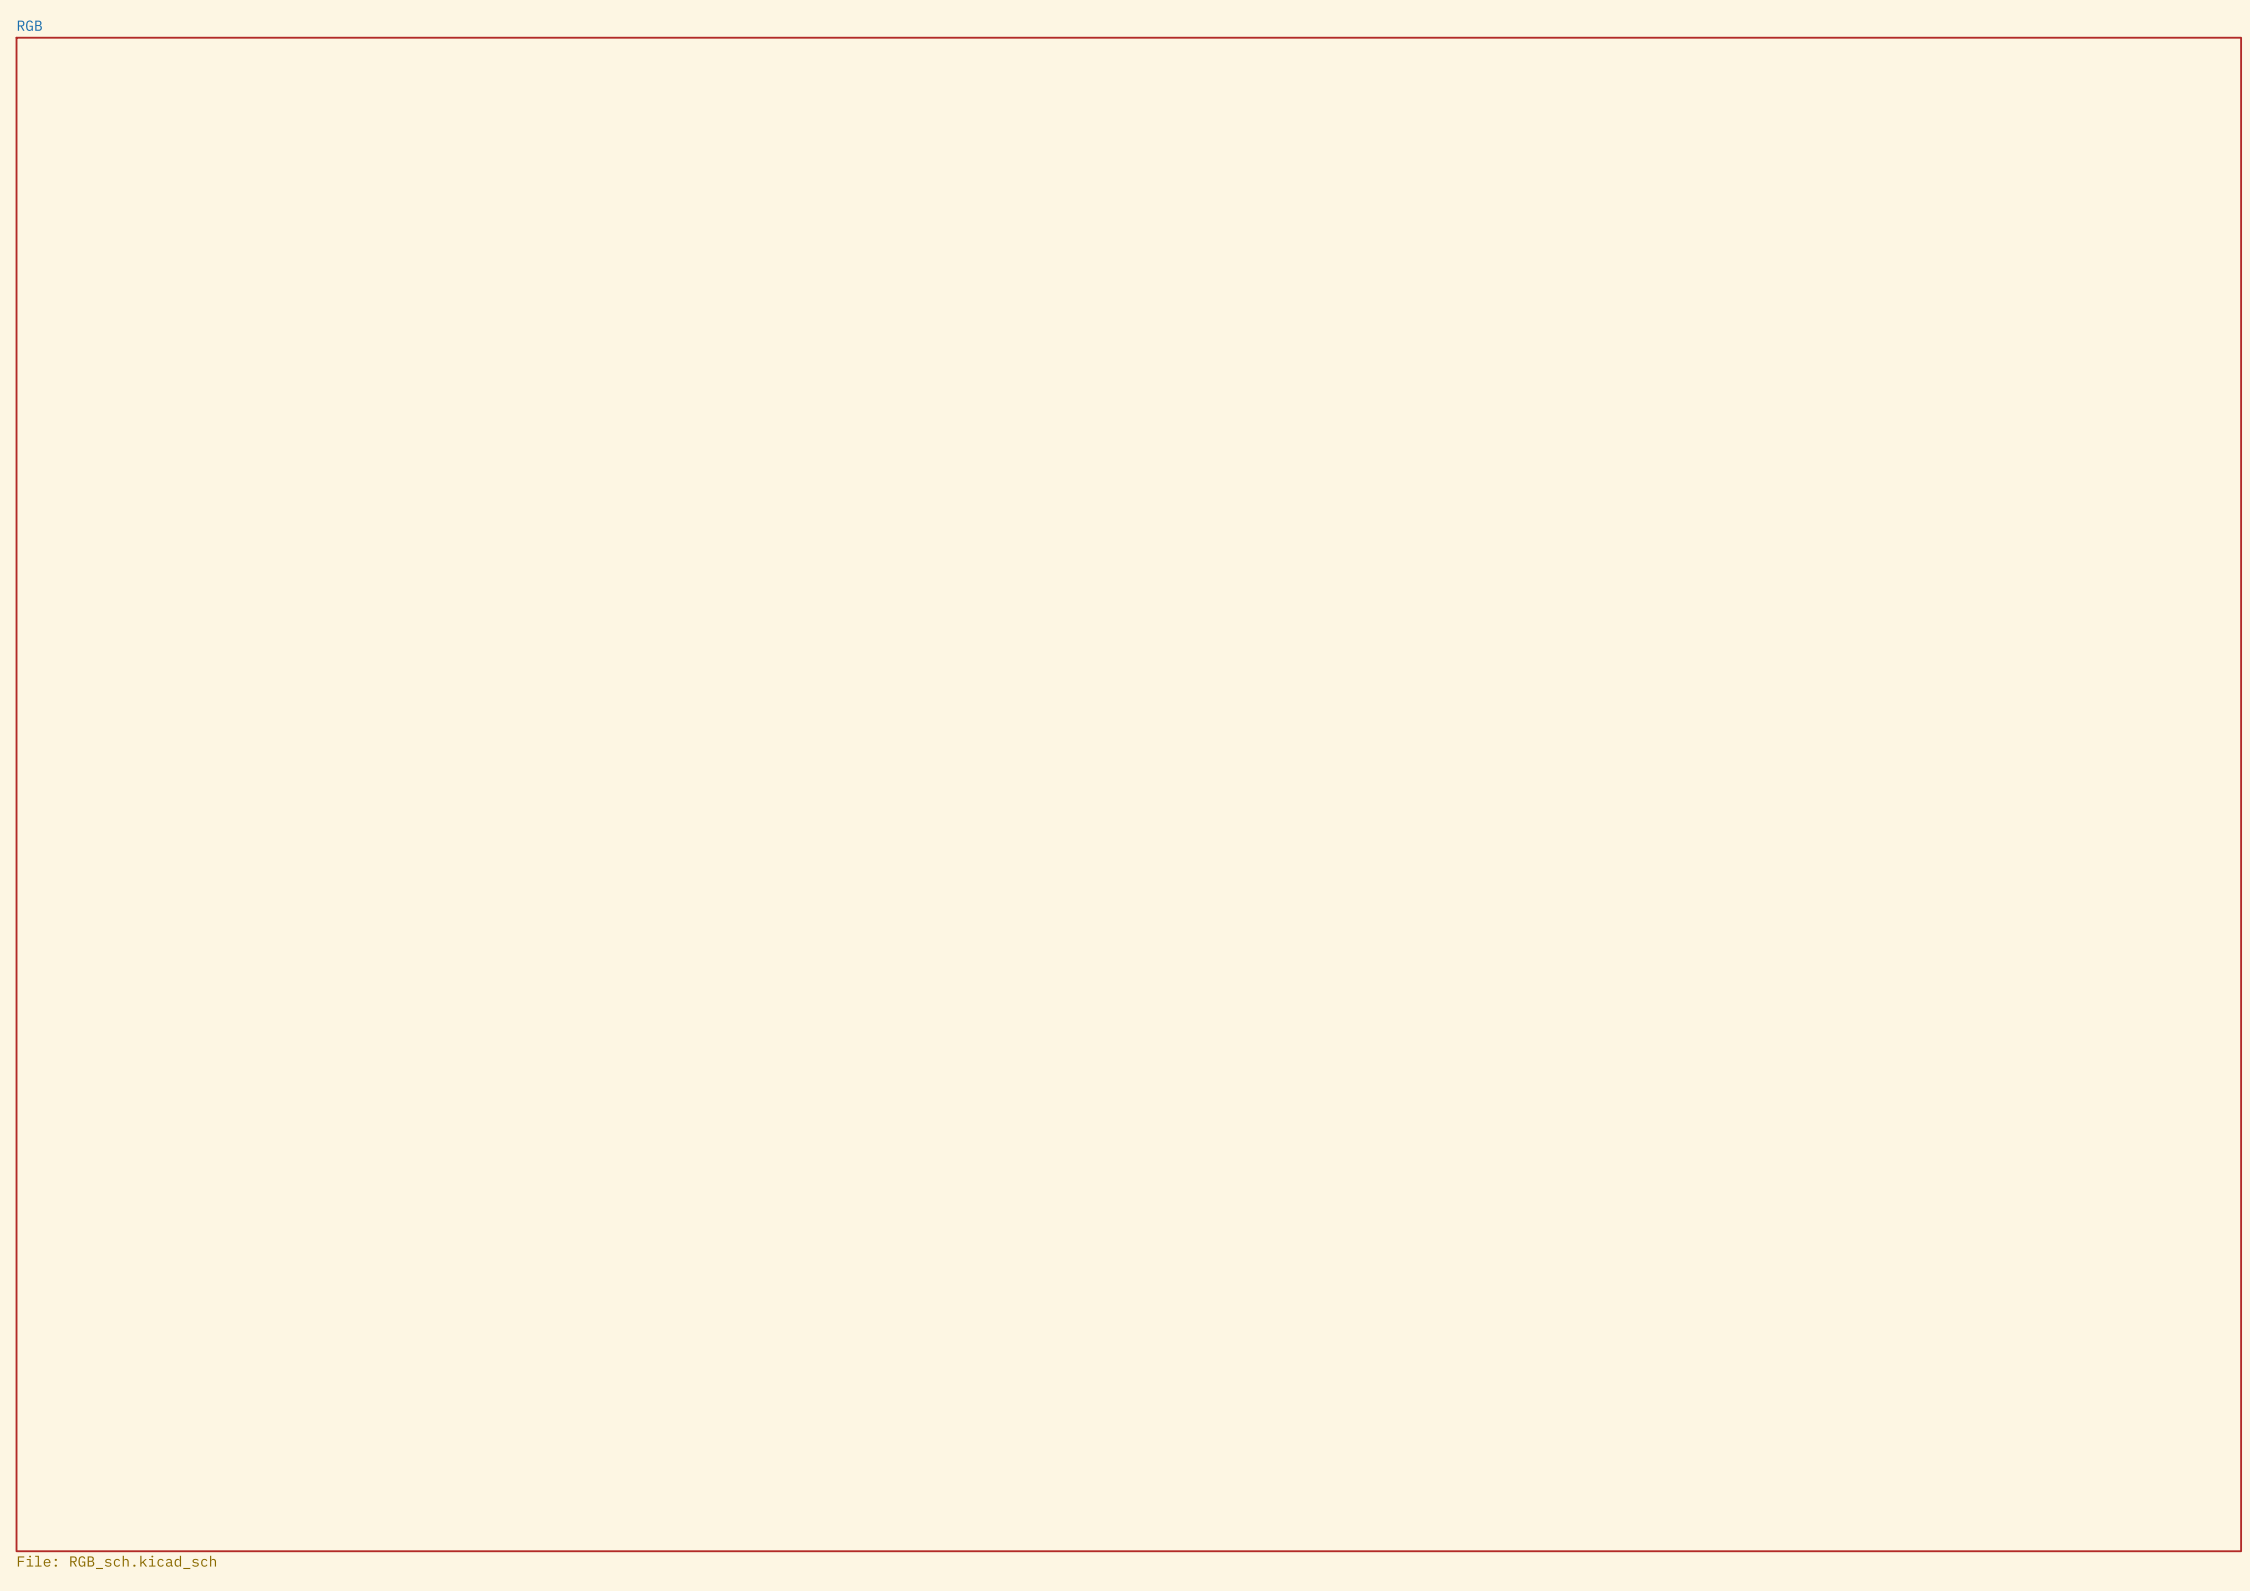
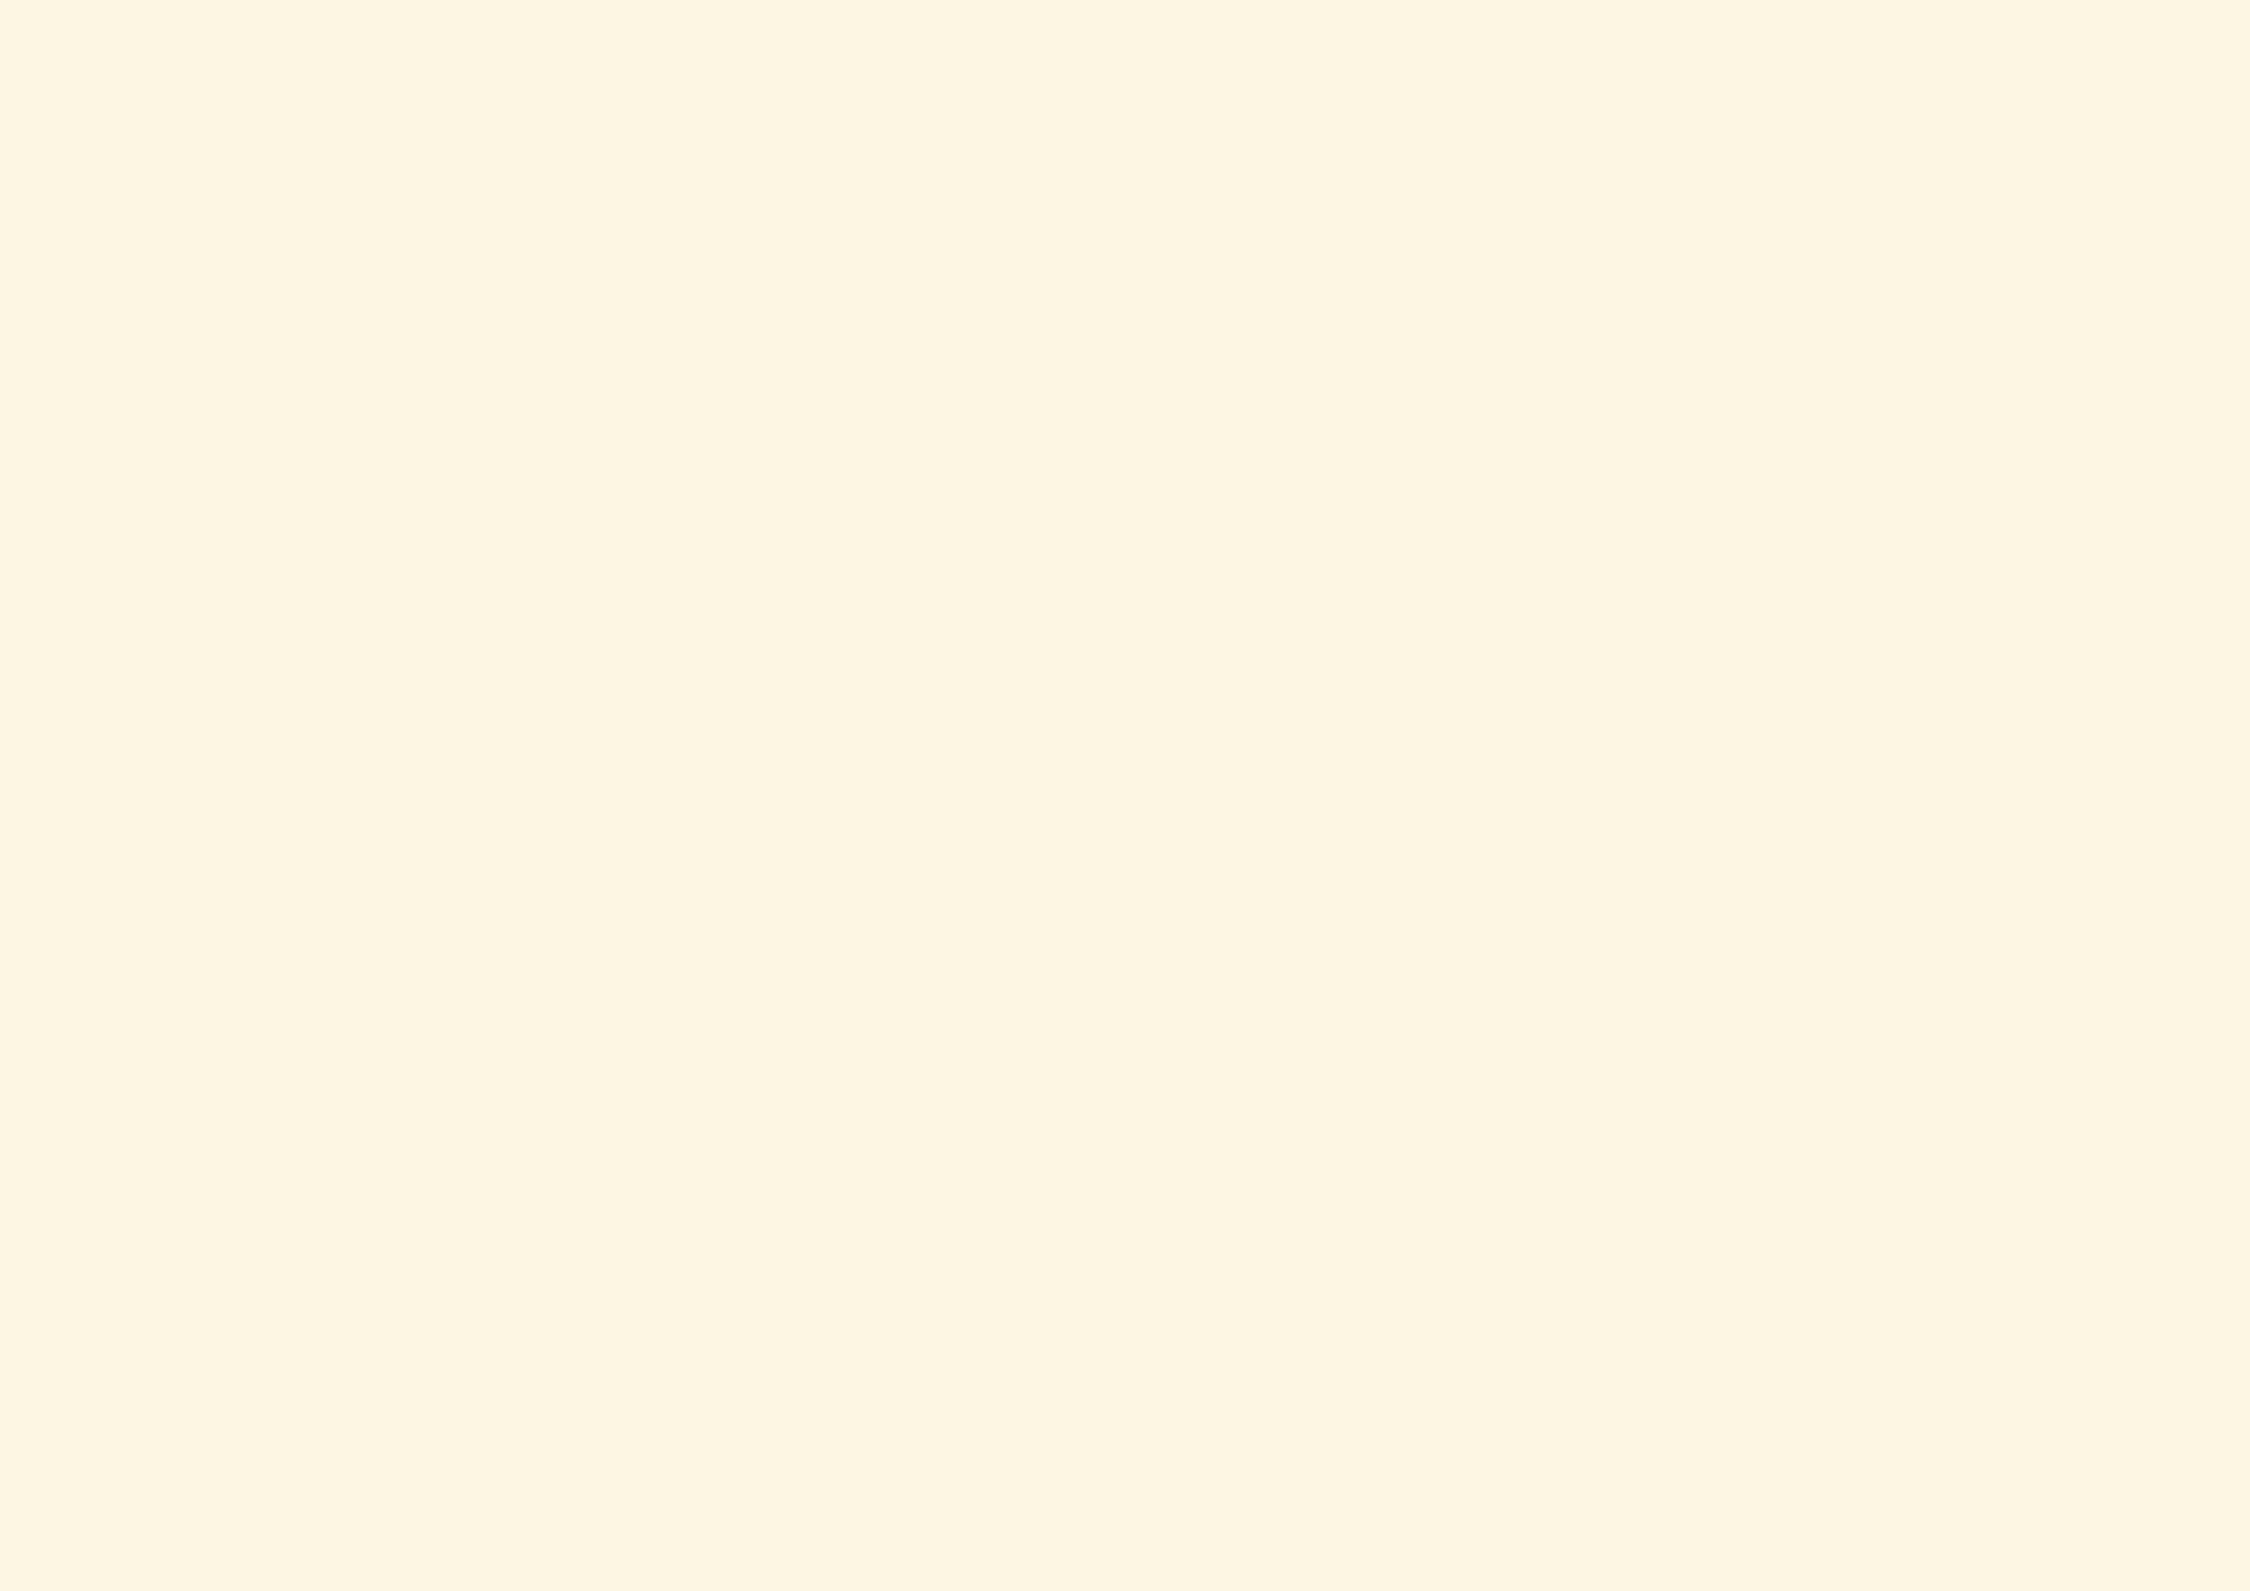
sheet RGB: File: RGB_sch.kicad_sch (1128, 794) -> none

